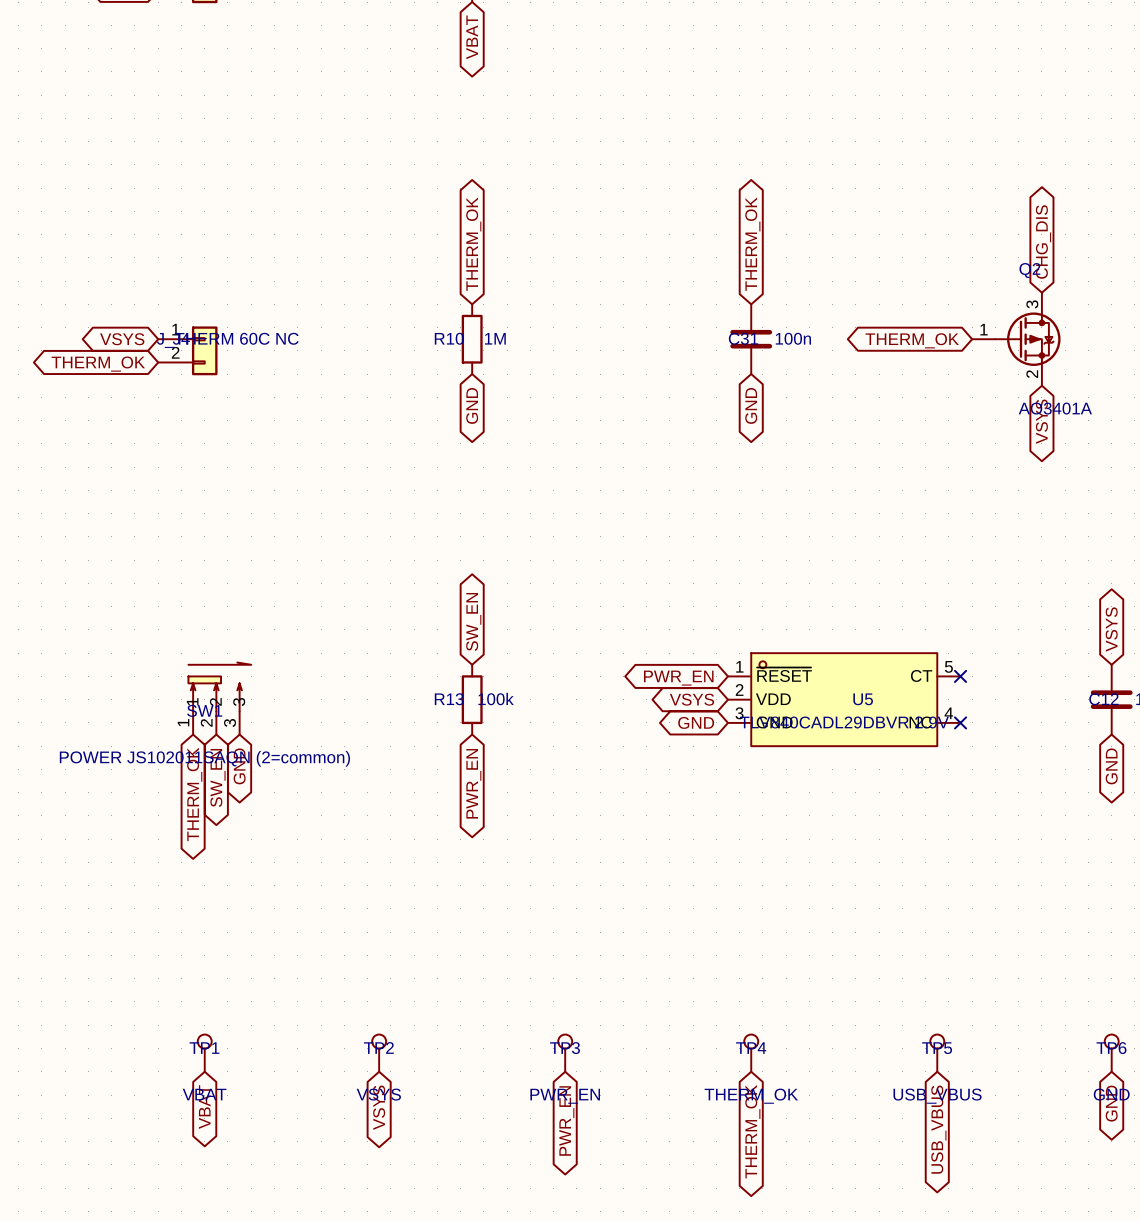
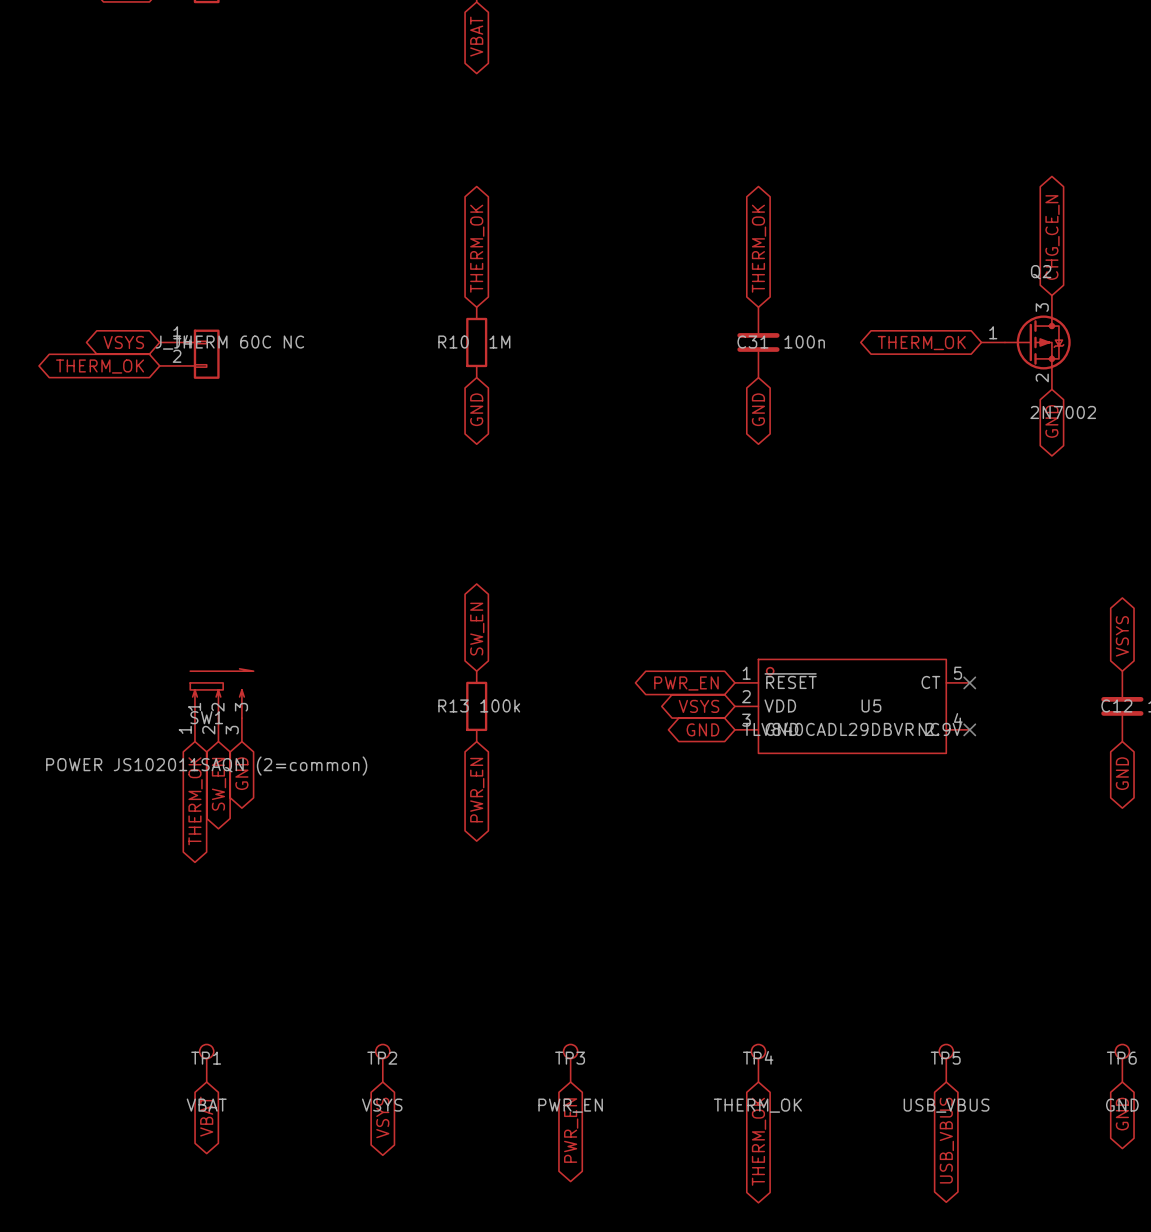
global label: CHG_DIS (1043, 242) -> CHG_CE_N (1052, 237)
Q2 value: AO3401A (1055, 408) -> 2N7002 (1063, 412)
global label: VSYS (1041, 421) -> GND (1051, 421)

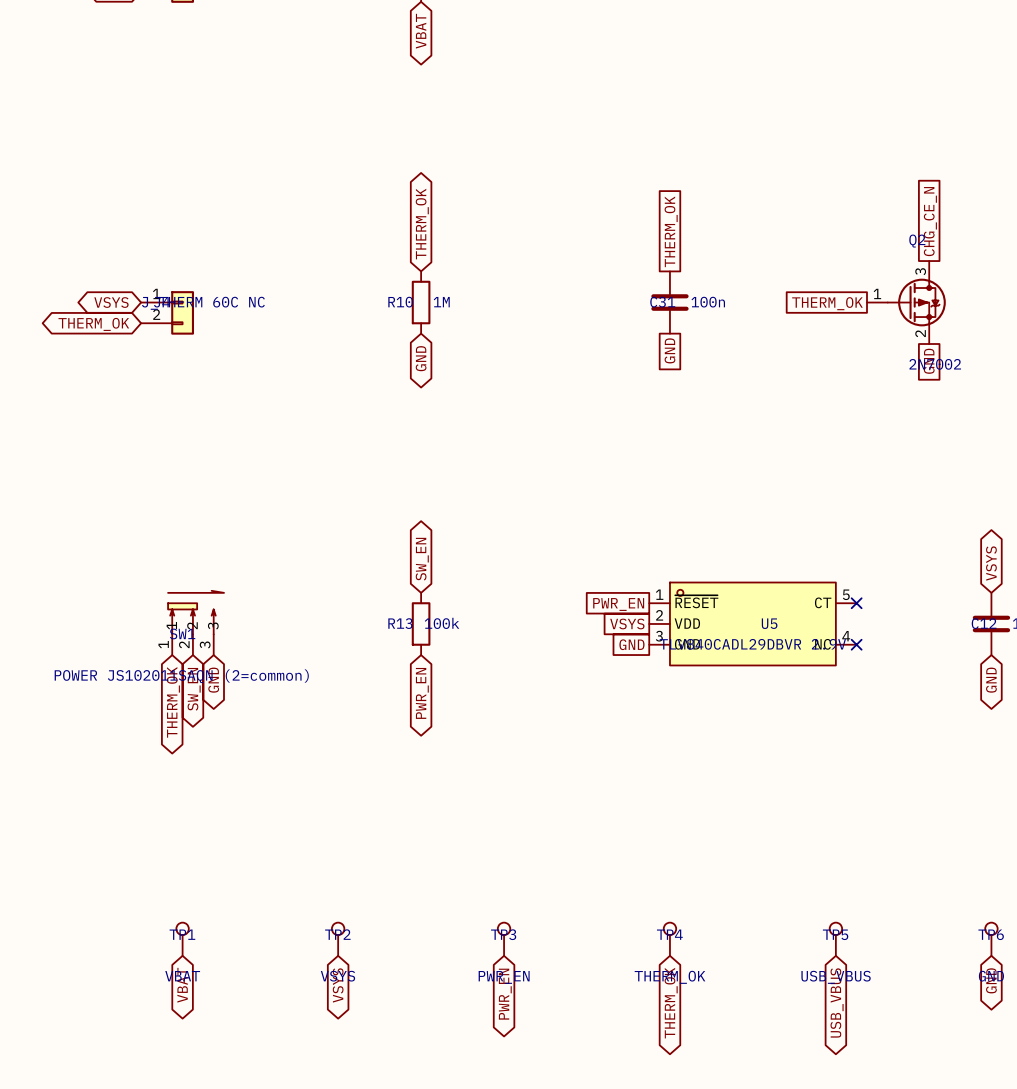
global label shape: bidirectional (1052, 237) -> passive (930, 221)
global label shape: bidirectional (759, 248) -> passive (671, 231)
global label shape: bidirectional (921, 343) -> passive (827, 303)
global label shape: bidirectional (758, 409) -> passive (669, 350)
global label shape: bidirectional (1051, 421) -> passive (929, 361)
global label shape: bidirectional (686, 683) -> passive (618, 604)
global label shape: bidirectional (699, 706) -> passive (627, 623)
global label shape: bidirectional (702, 729) -> passive (631, 644)

